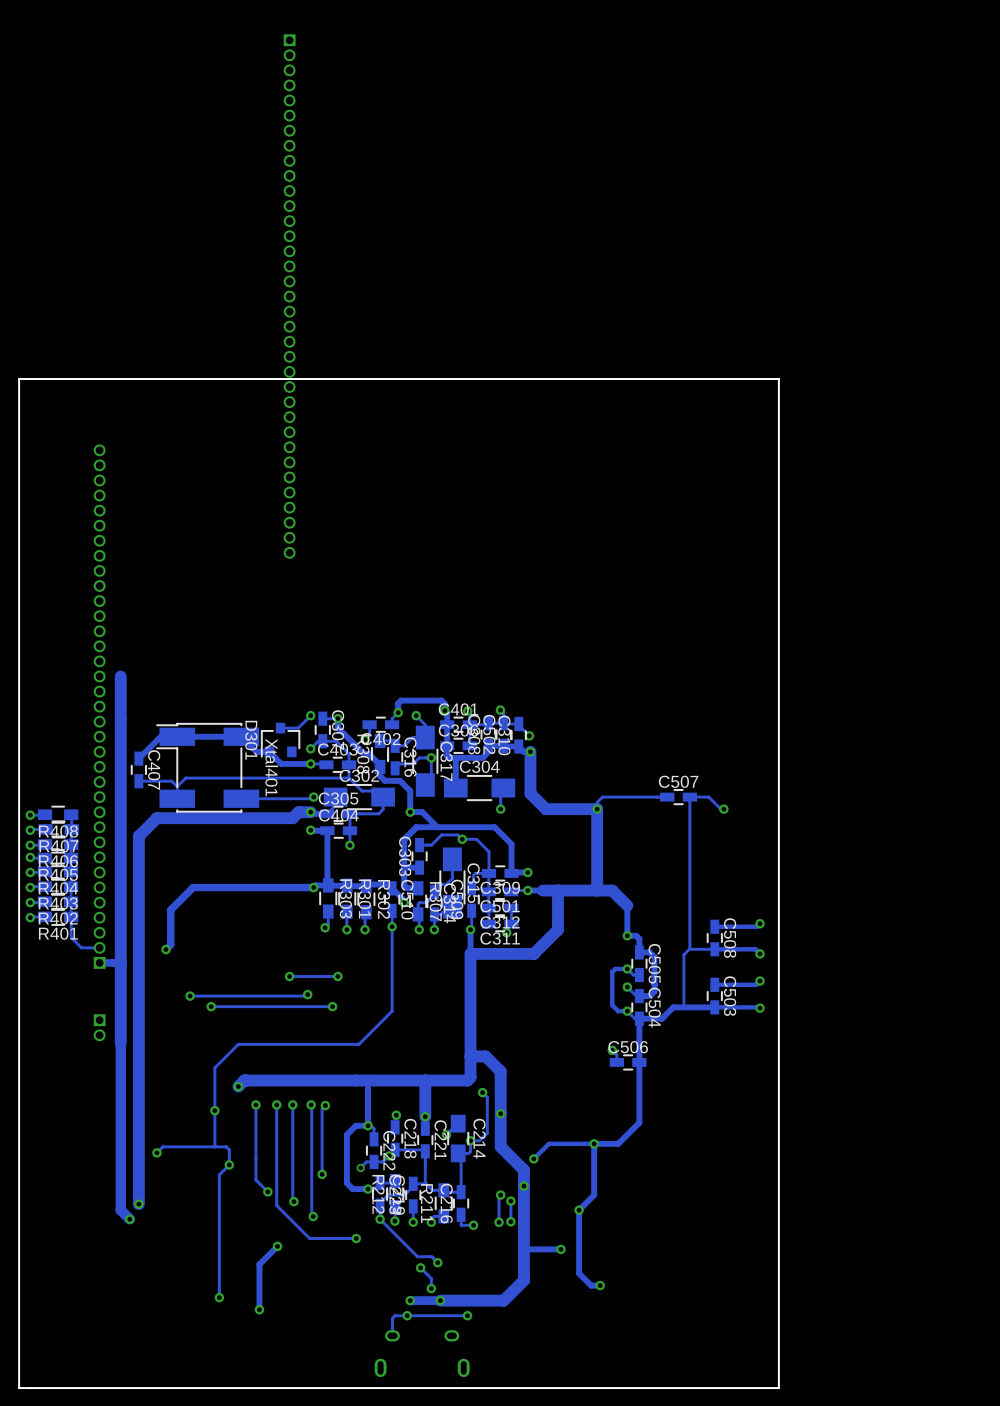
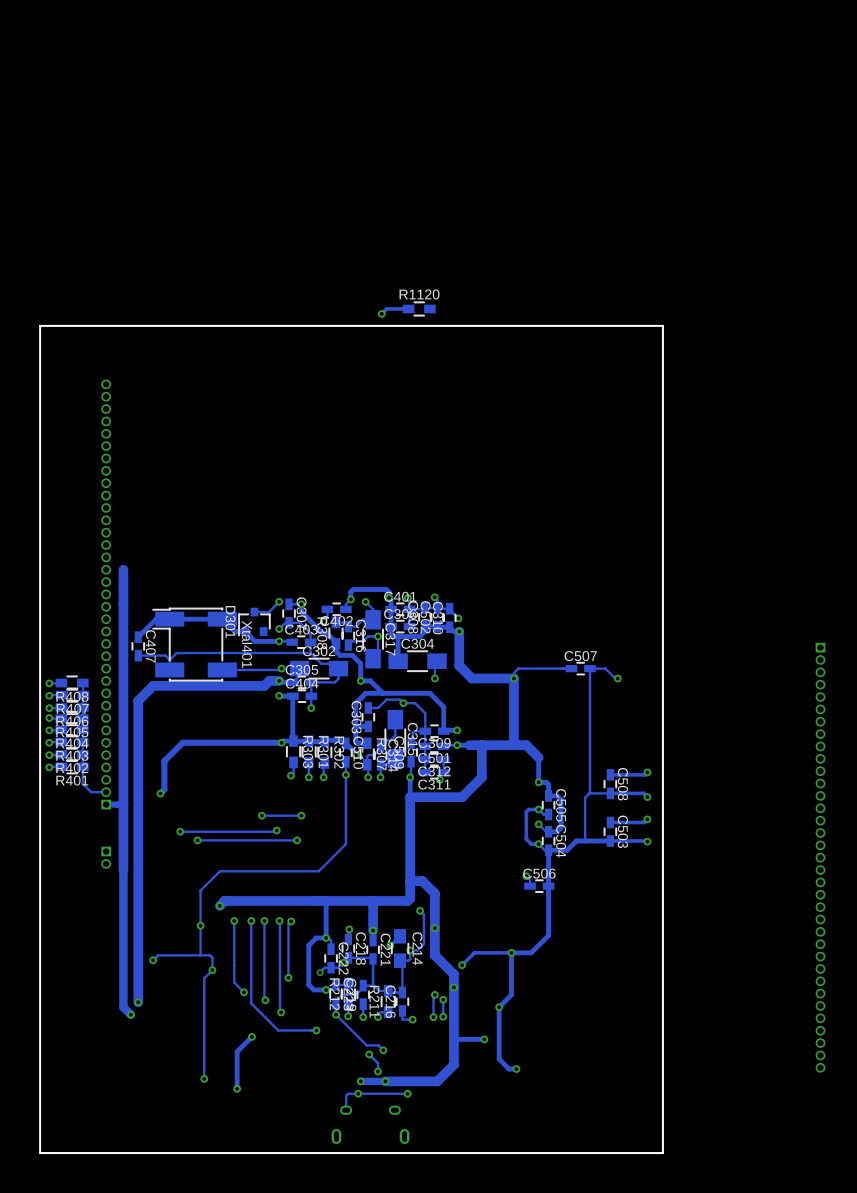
part: (289, 296) -> none
track: none -> (408, 308) (386, 308) (381, 313)
R1120: none -> (419, 308)
via: none -> (381, 313)
part: none -> (820, 857)

